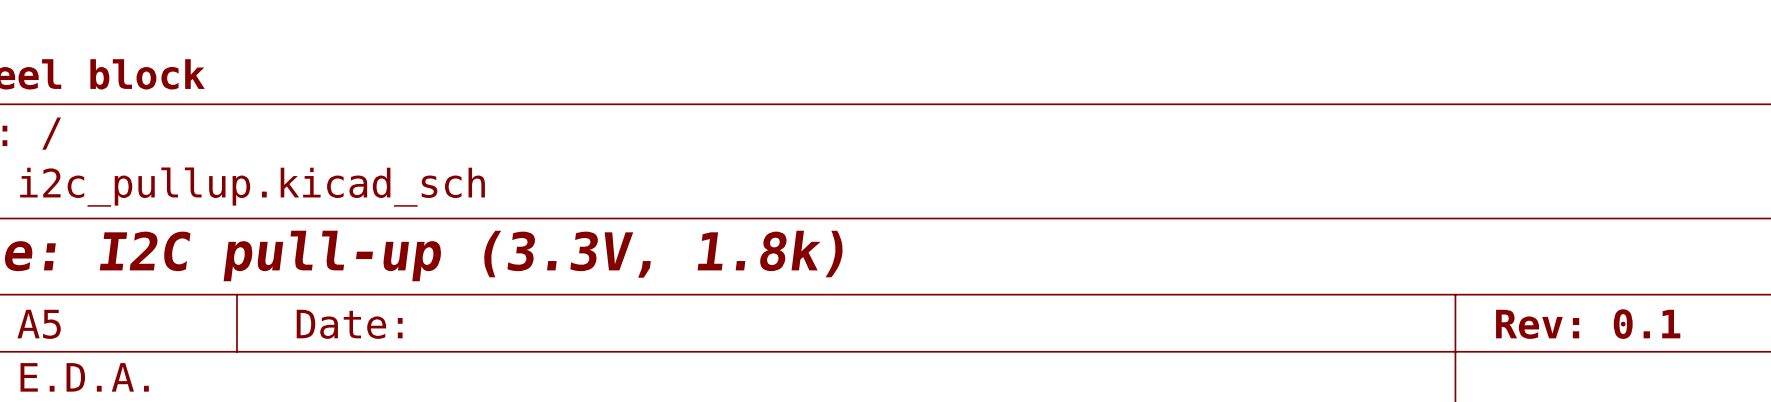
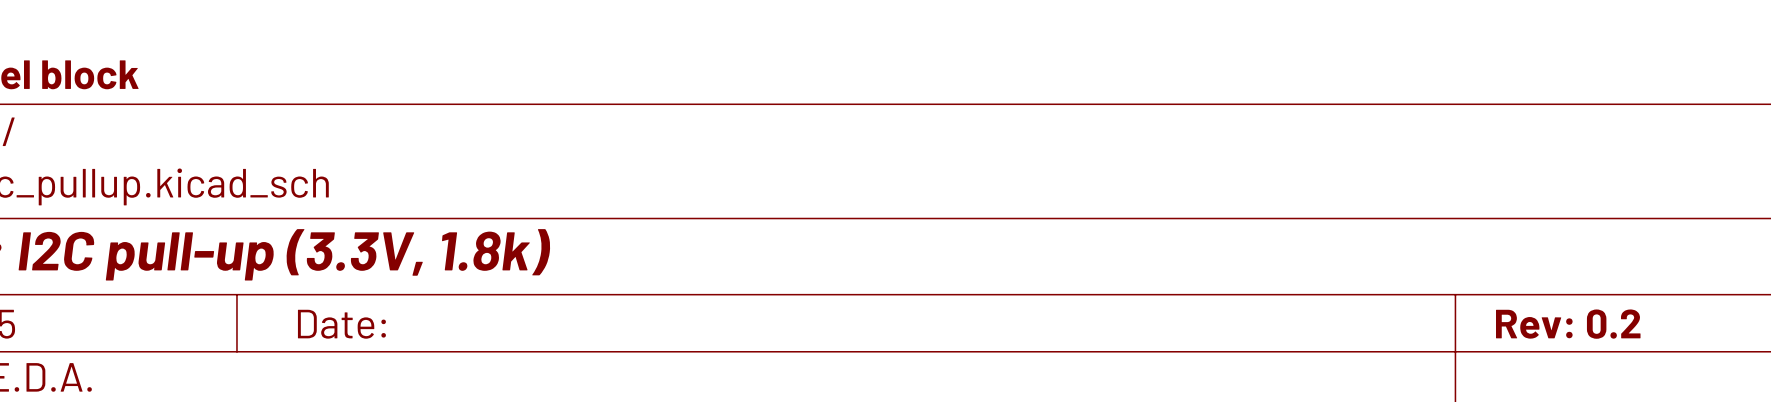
title block: Rev: 0.1 (1588, 324) -> Rev: 0.2 (1568, 324)

